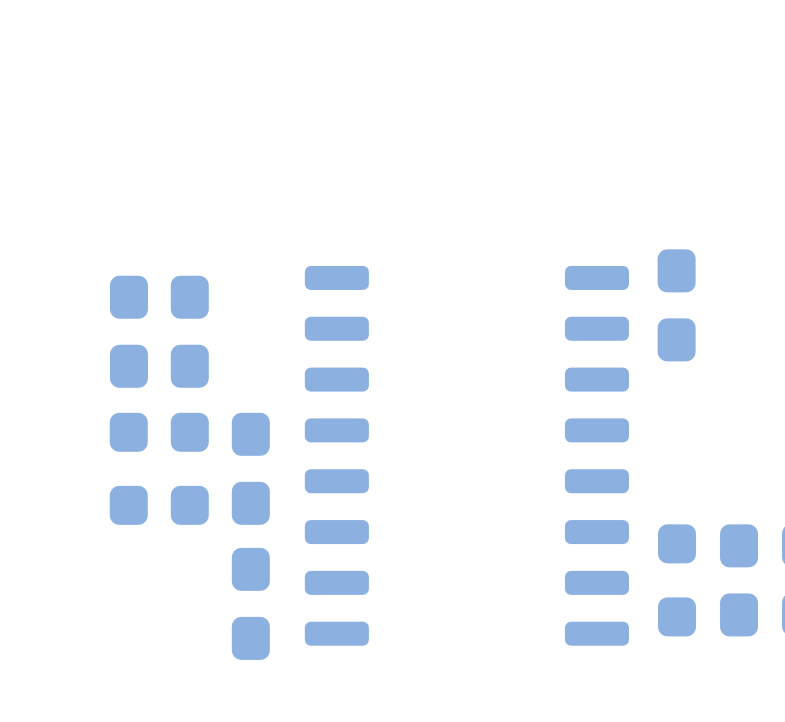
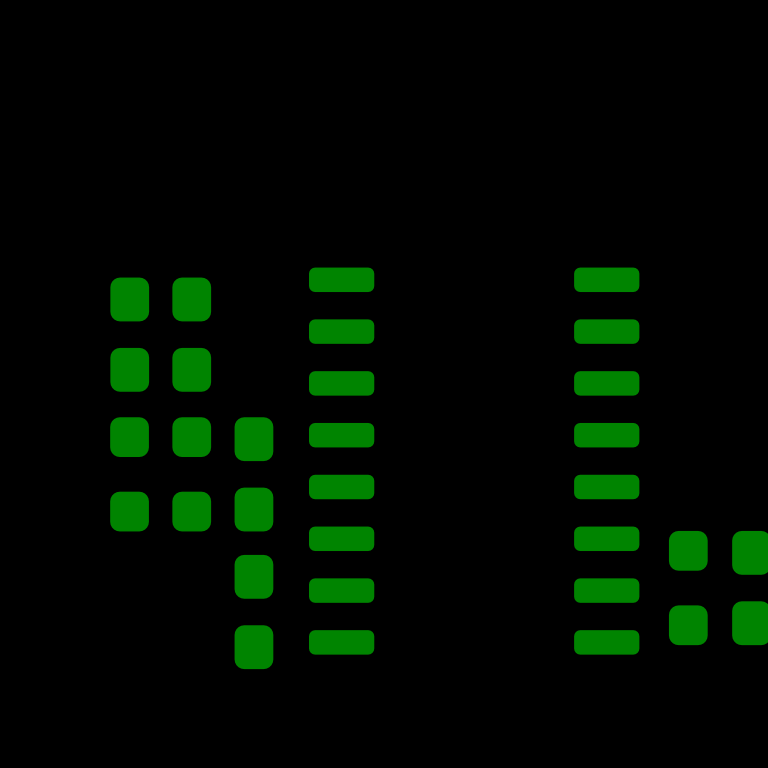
part: (676, 305) -> none

